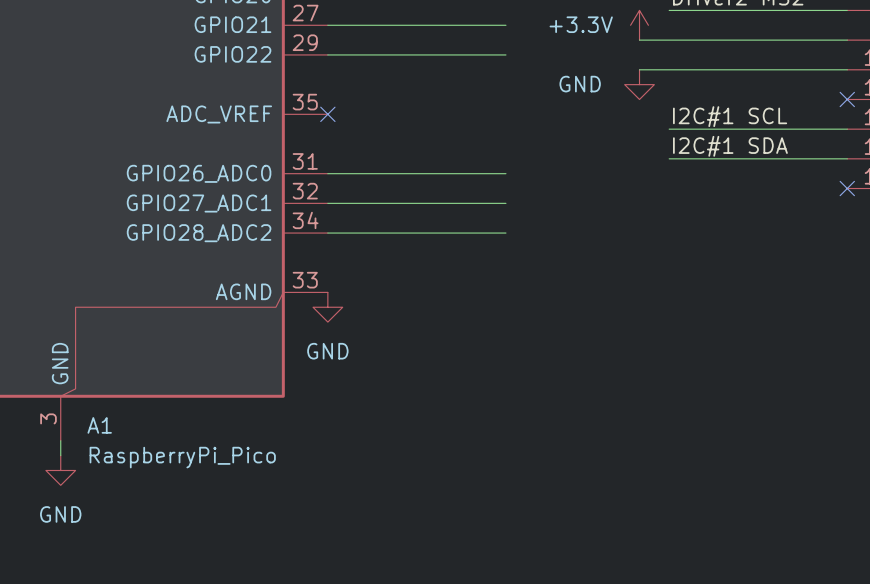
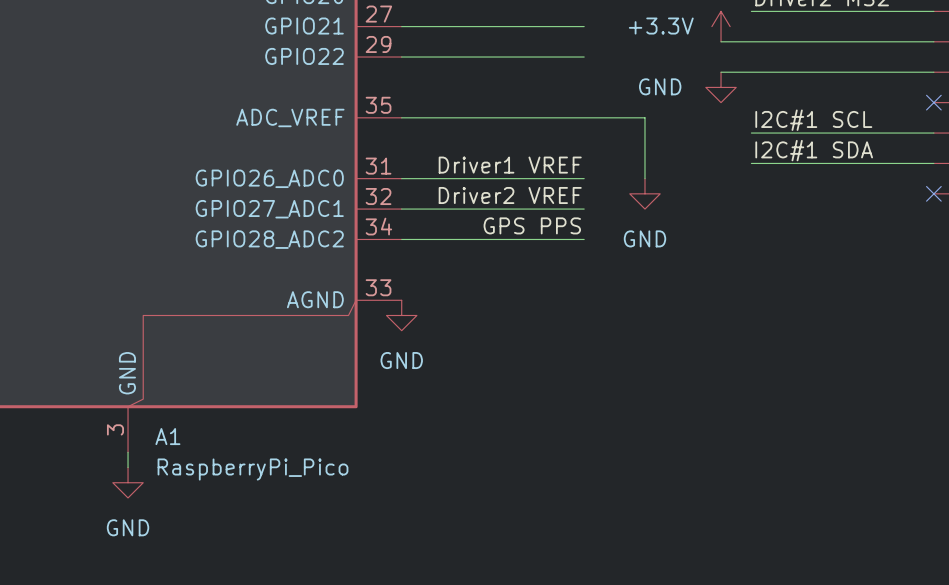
wire: none -> (401, 117) (644, 117) (644, 178)
no-connect mark: (327, 114) -> none
label: none -> Driver1 VREF (510, 165)
power symbol: none -> GND (644, 193)
label: none -> Driver2 VREF (510, 195)
label: none -> GPS PPS (532, 225)

